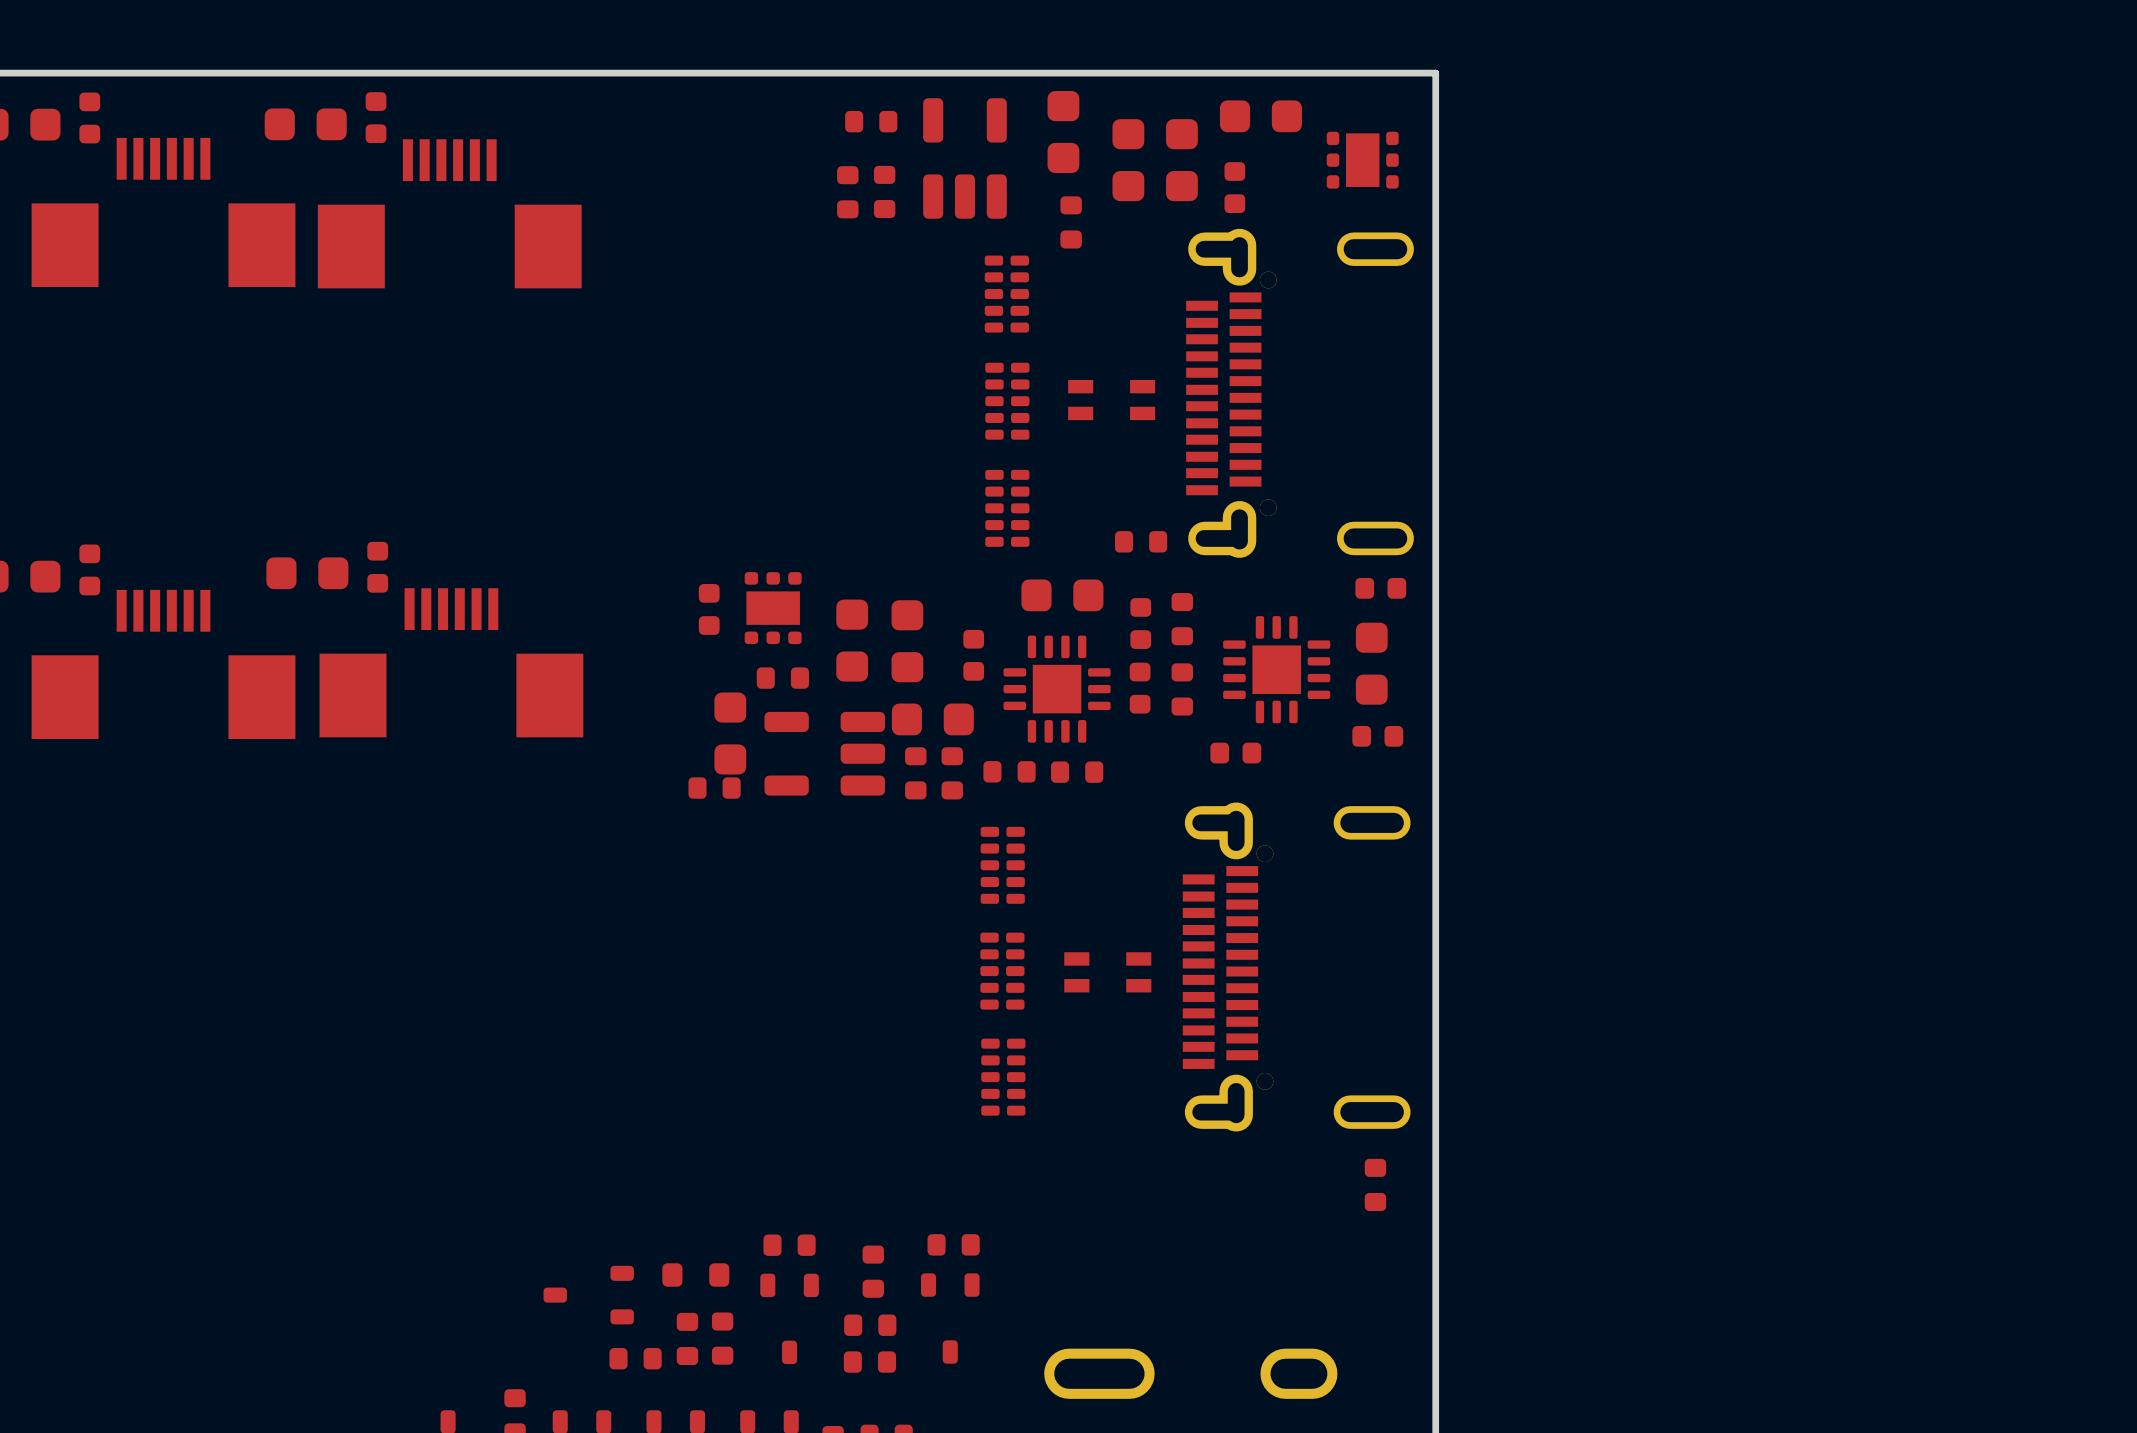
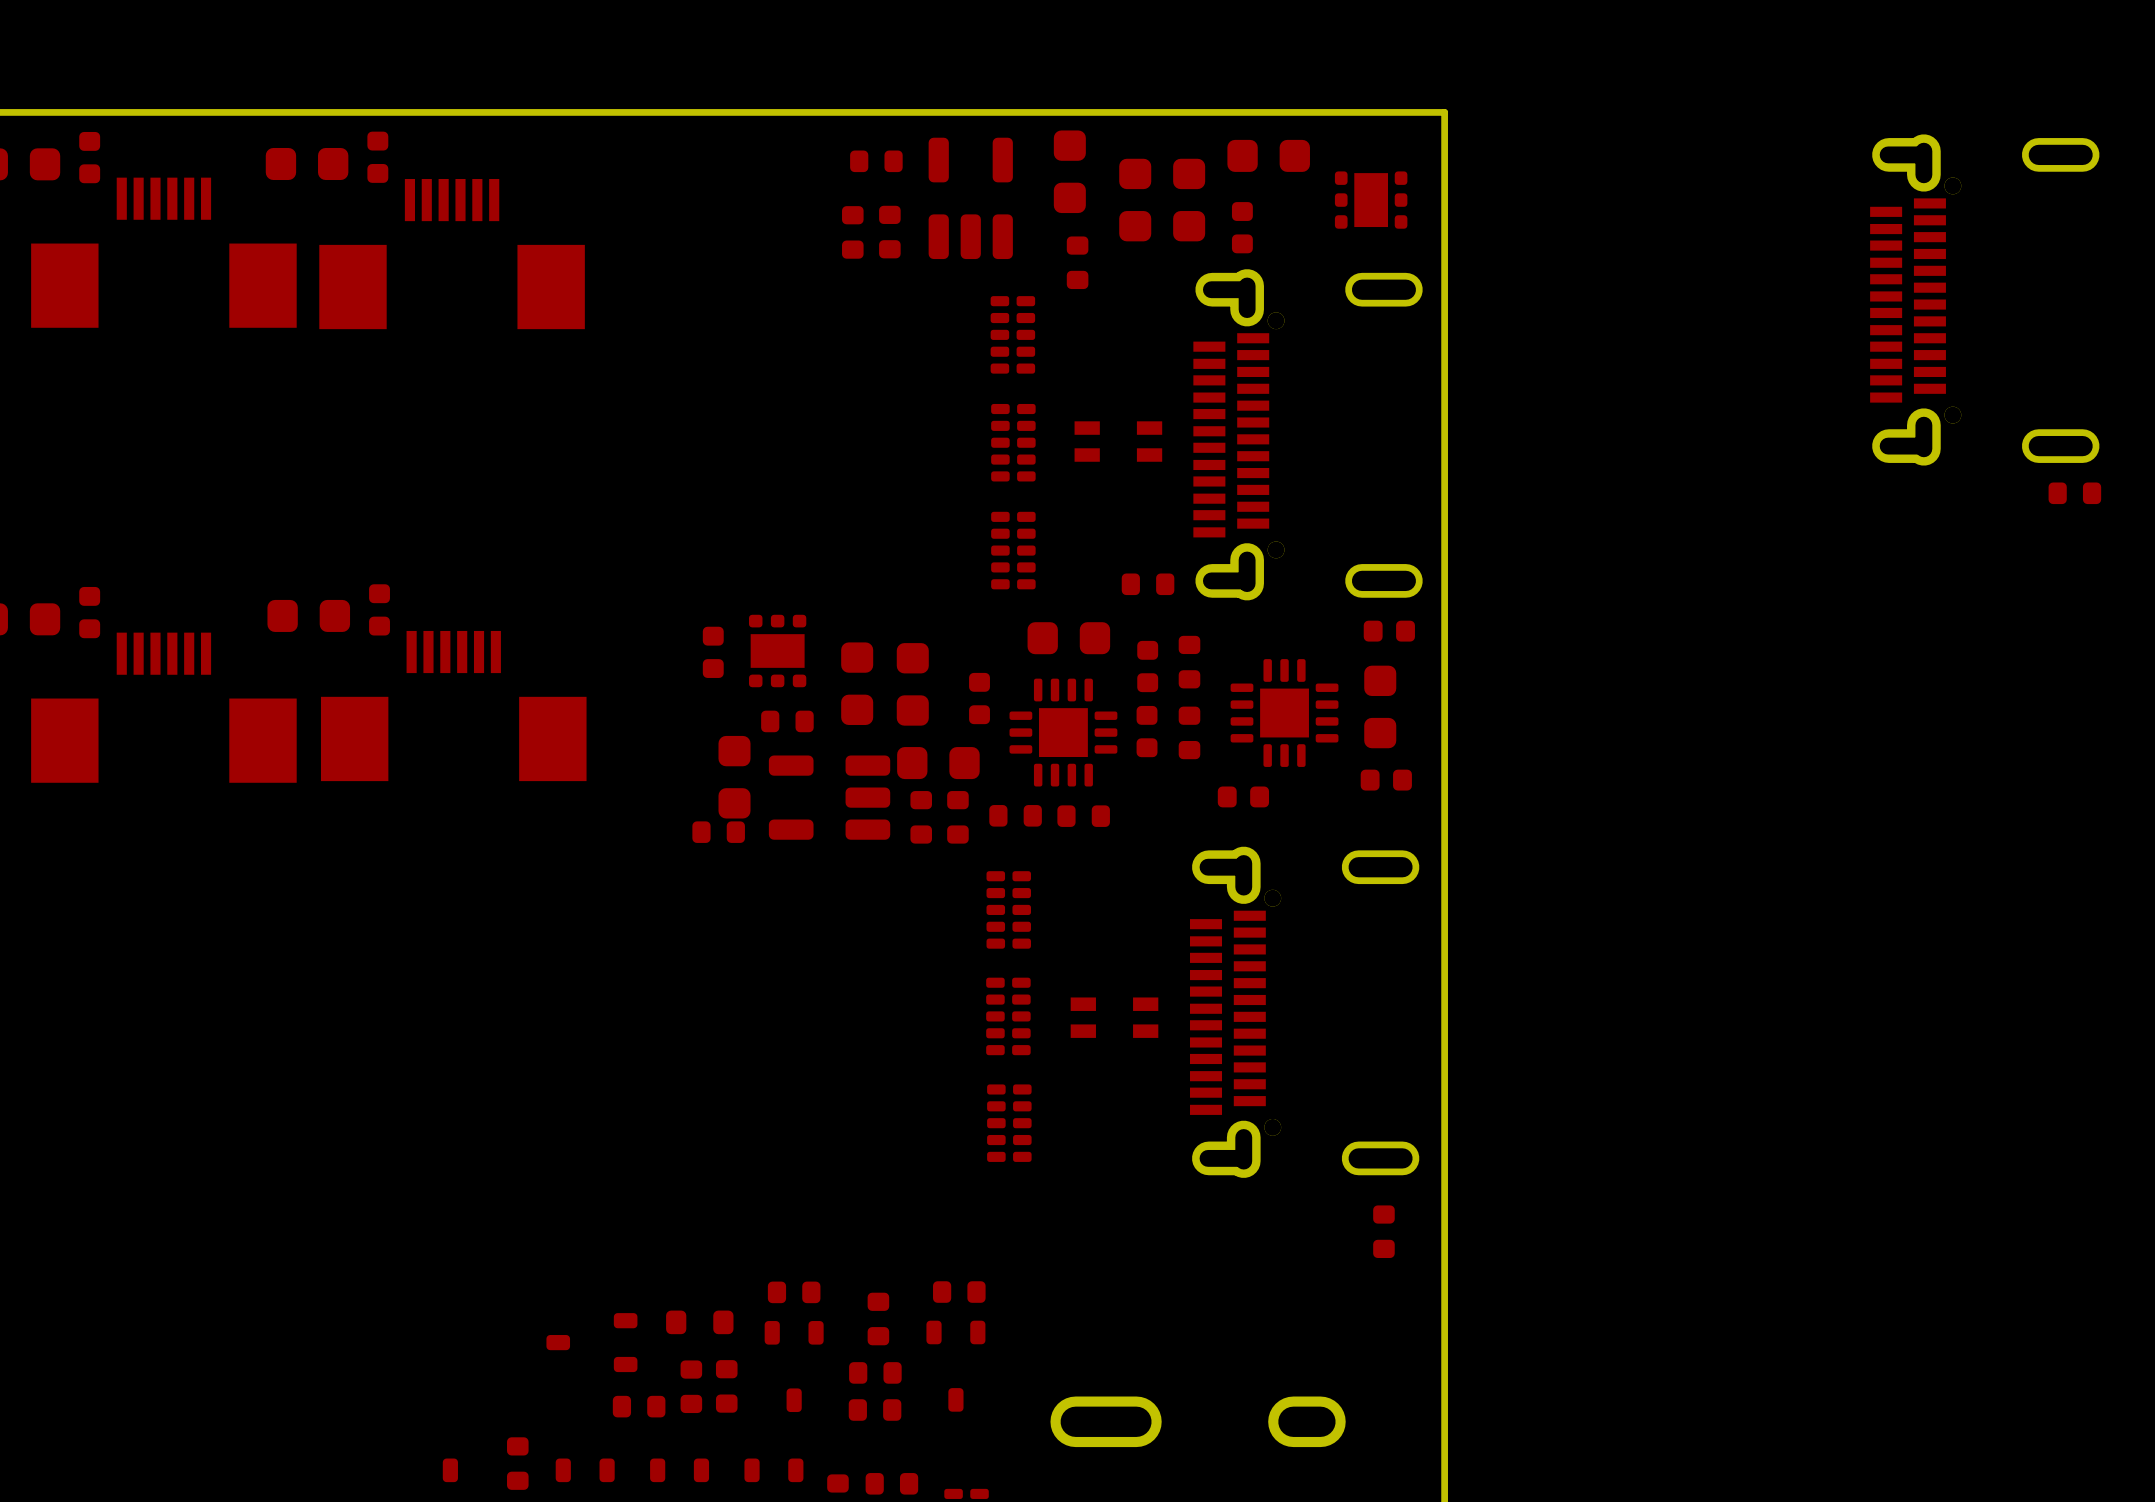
part: none -> (1984, 299)
part: none -> (2074, 493)

